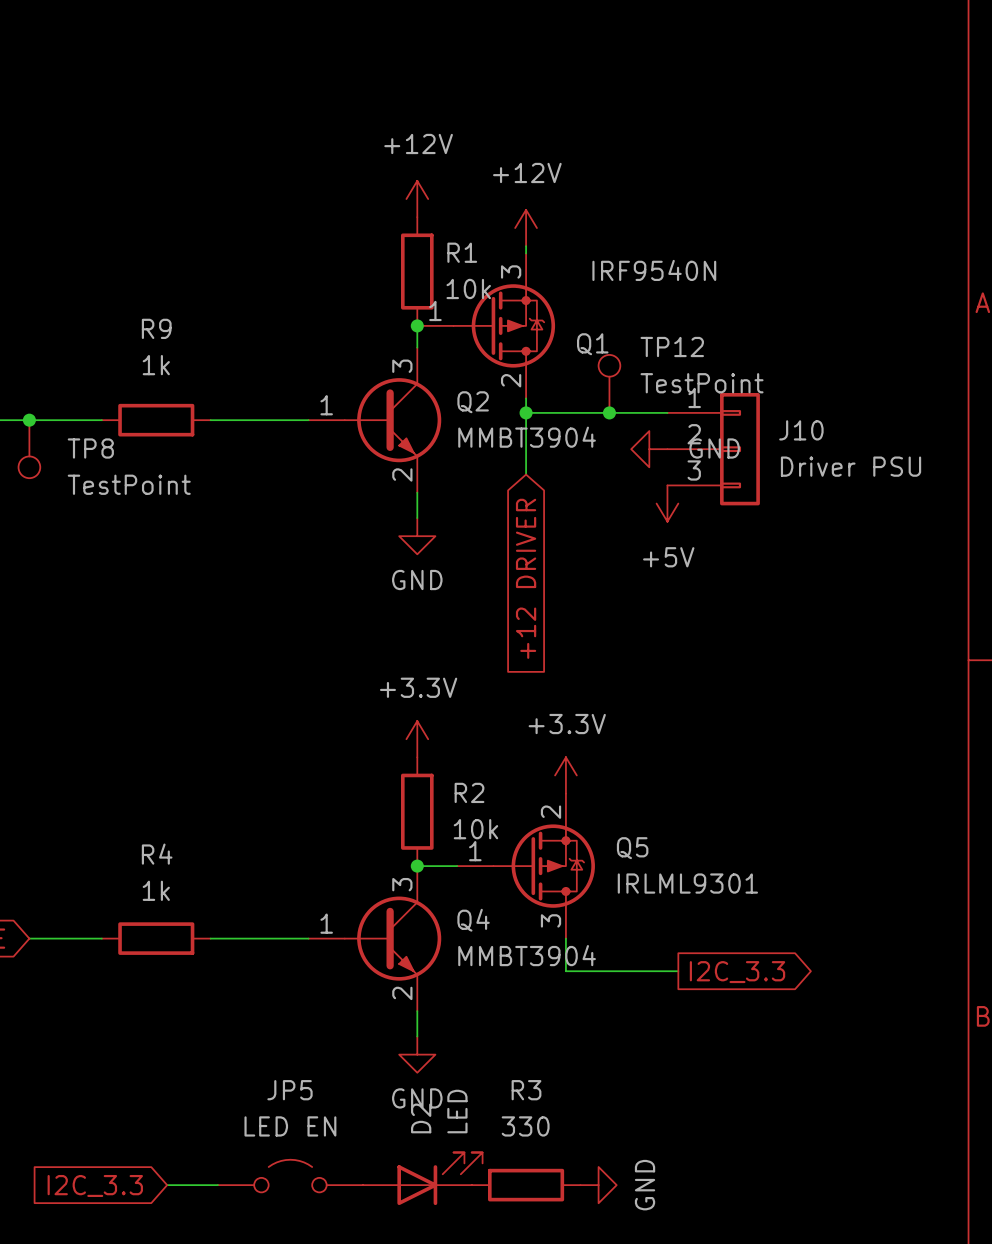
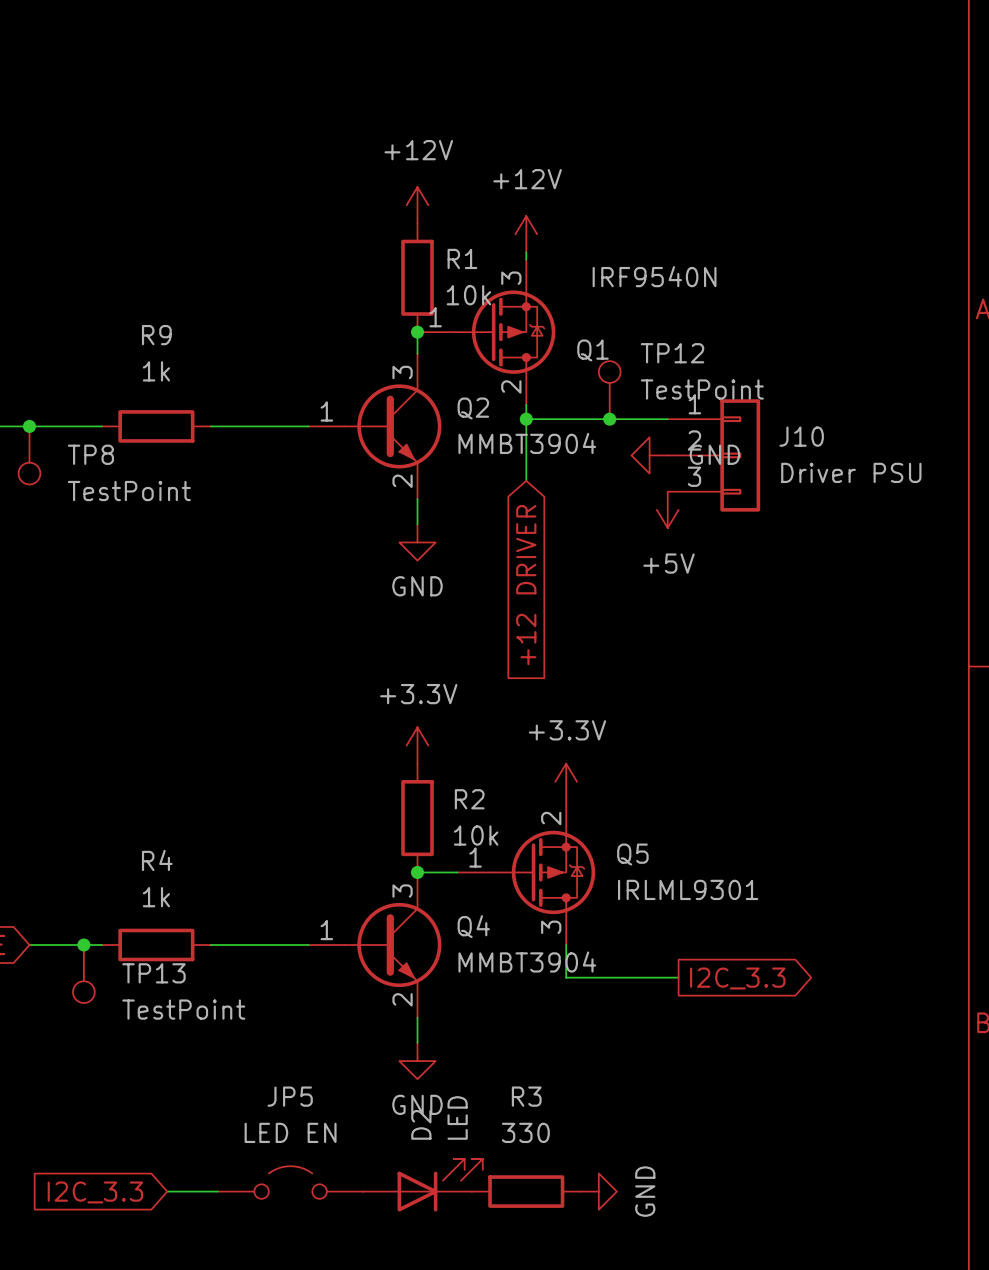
junction: none -> (83, 944)
TP13: none -> TestPoint (83, 974)

